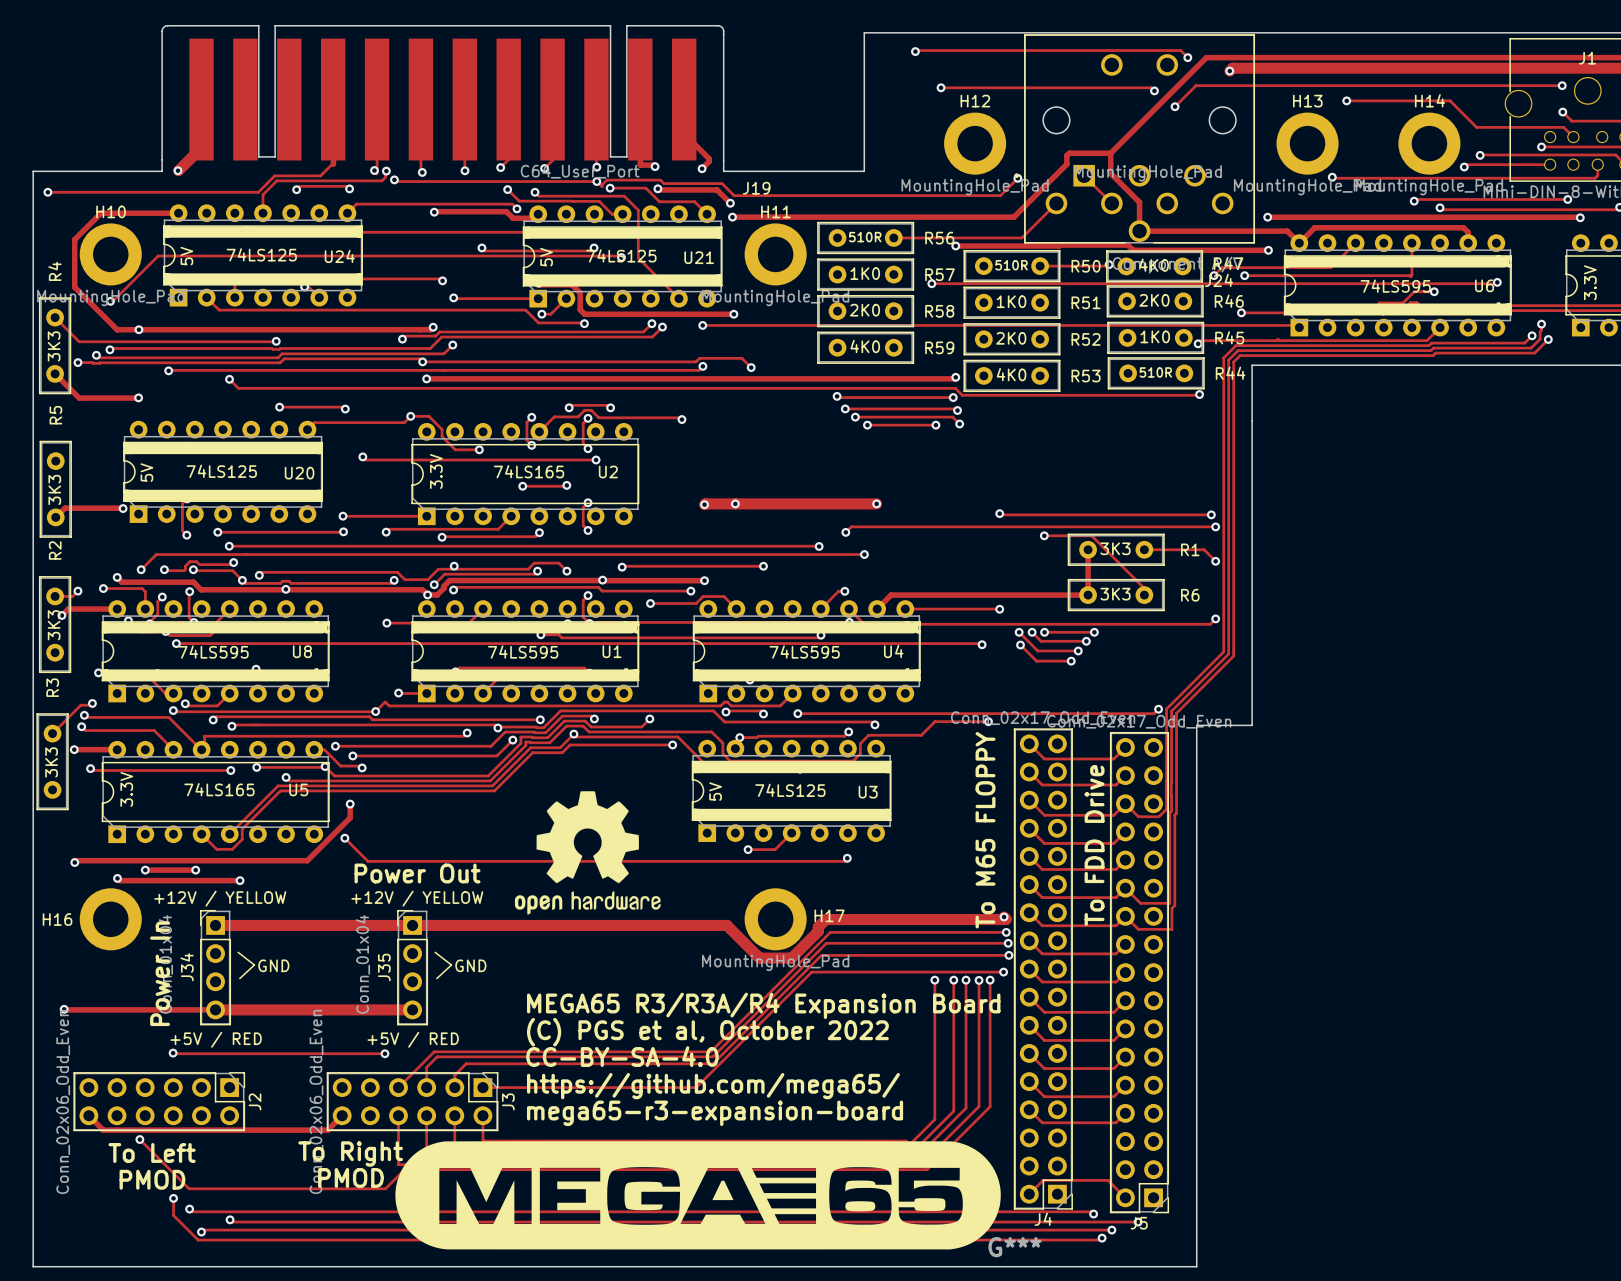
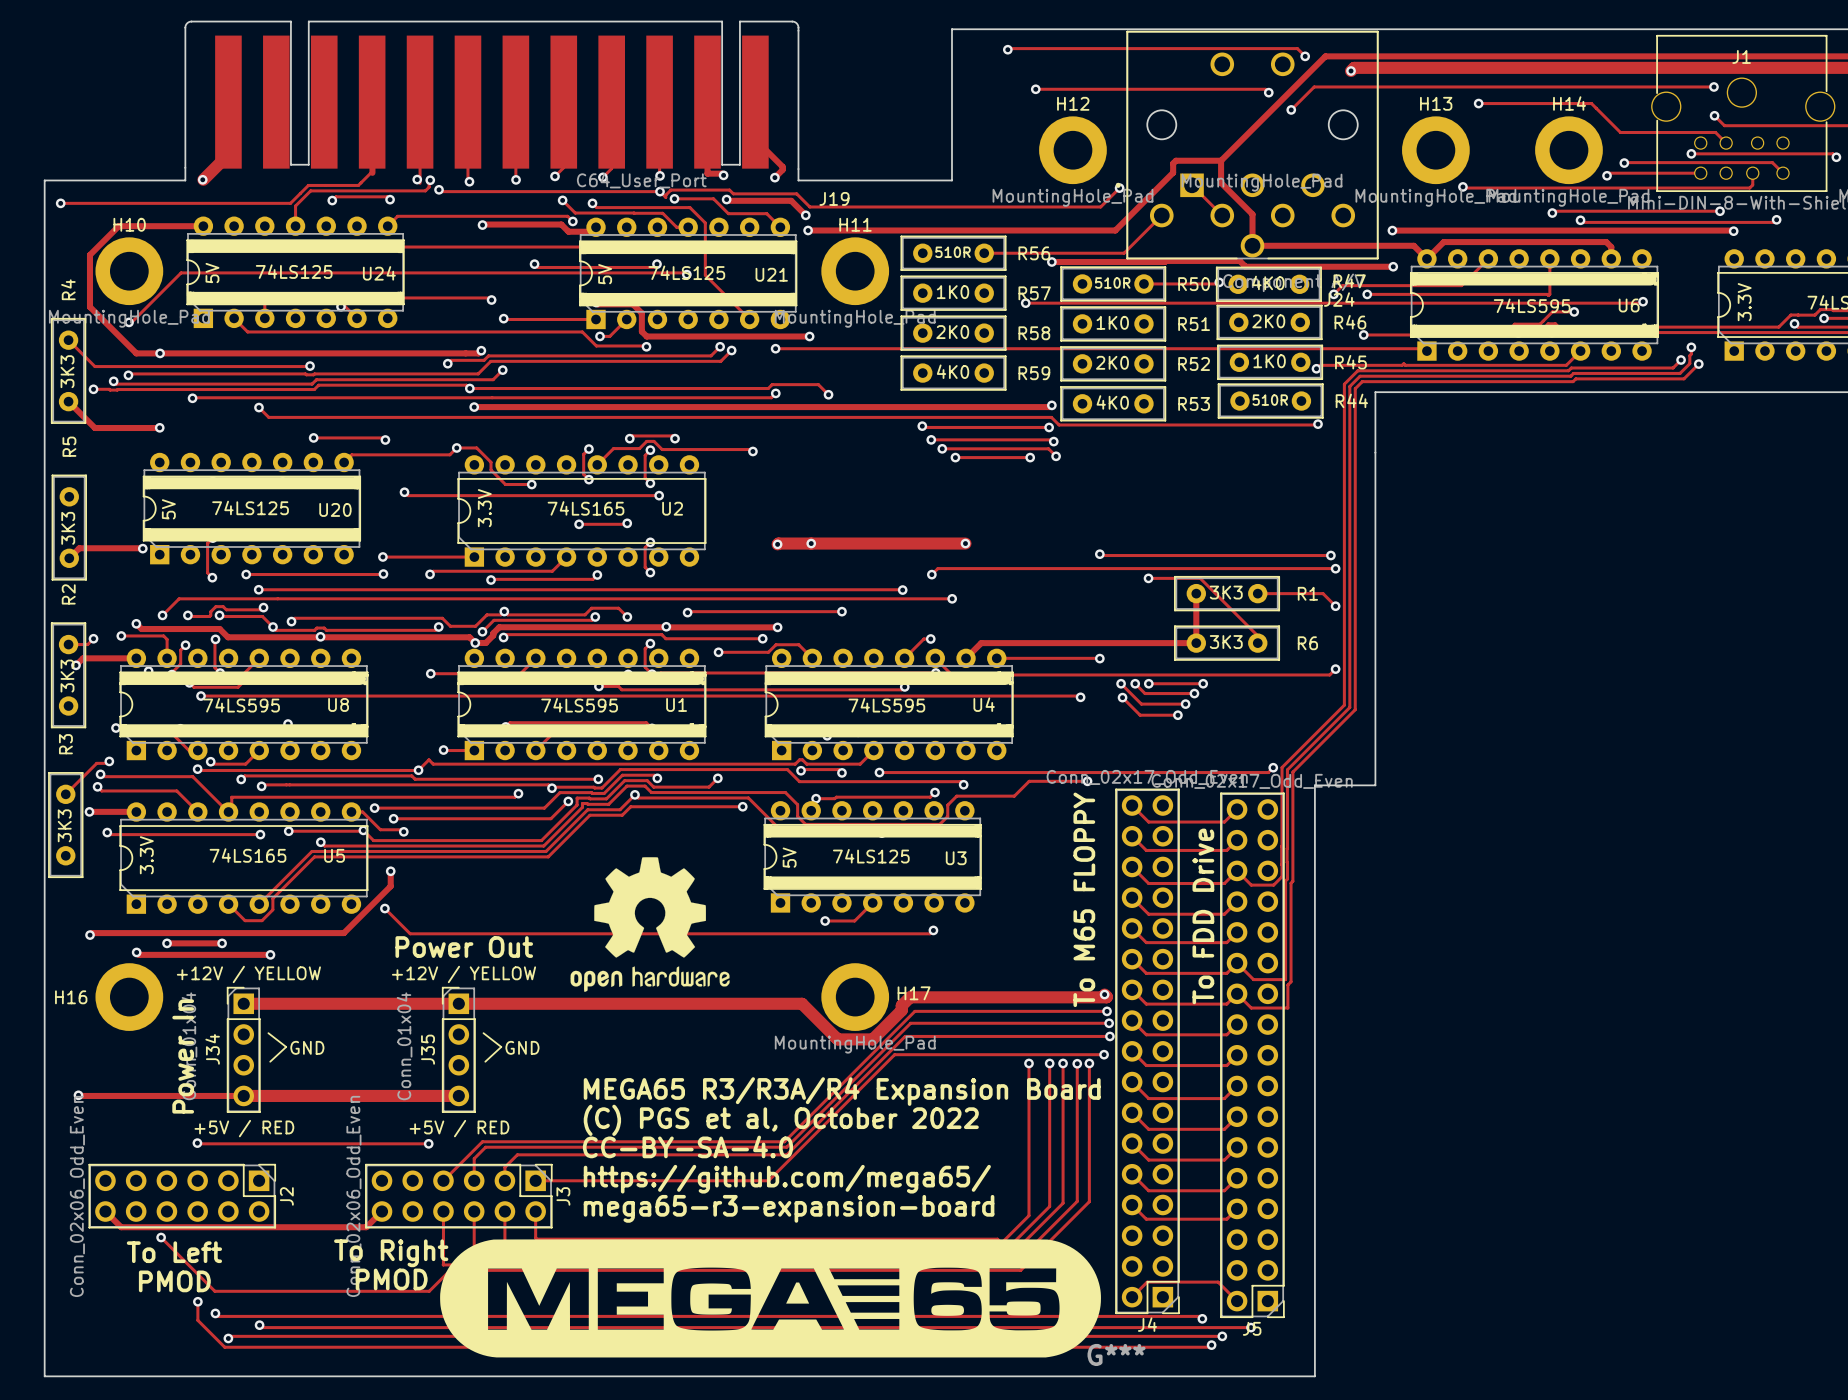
board edge: (610, 25) (610, 156) (626, 156) (626, 25) -> (674, 21) (692, 21)
board edge: (653, 25) (670, 25) -> (722, 21) (722, 164) (739, 164) (739, 21)

